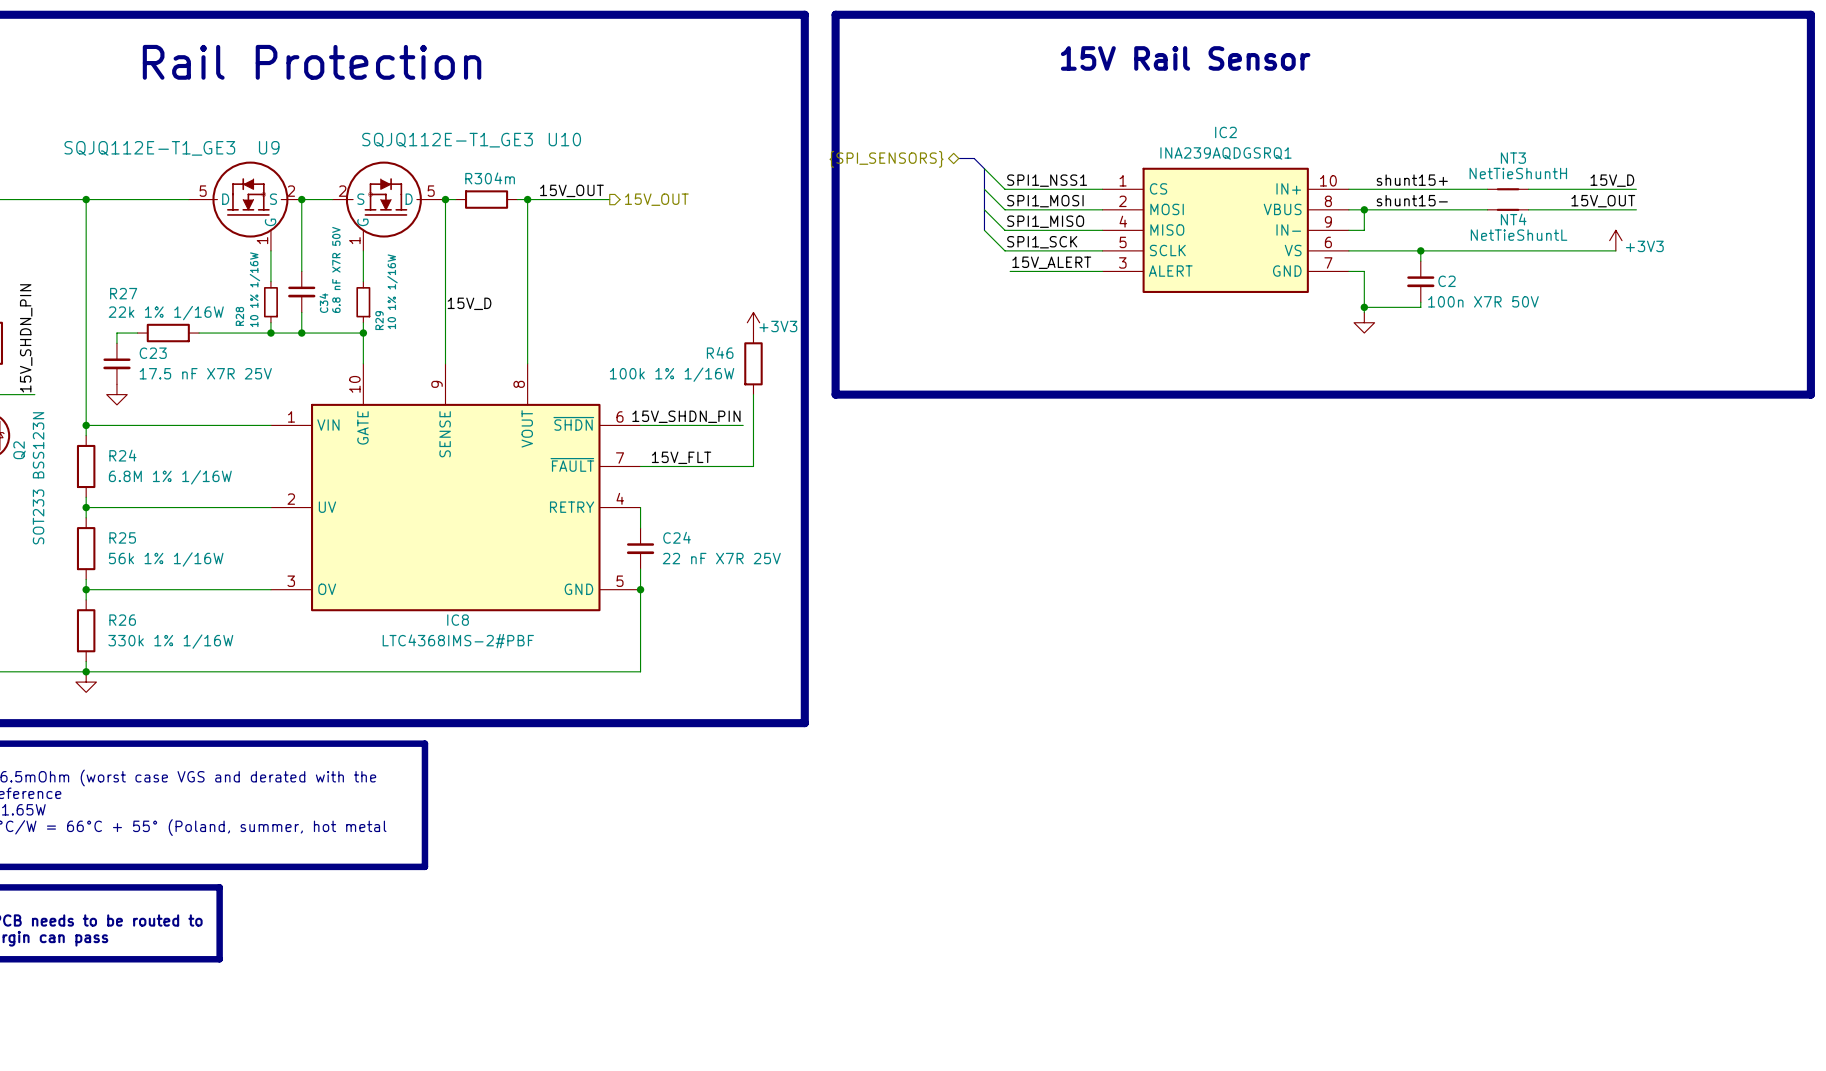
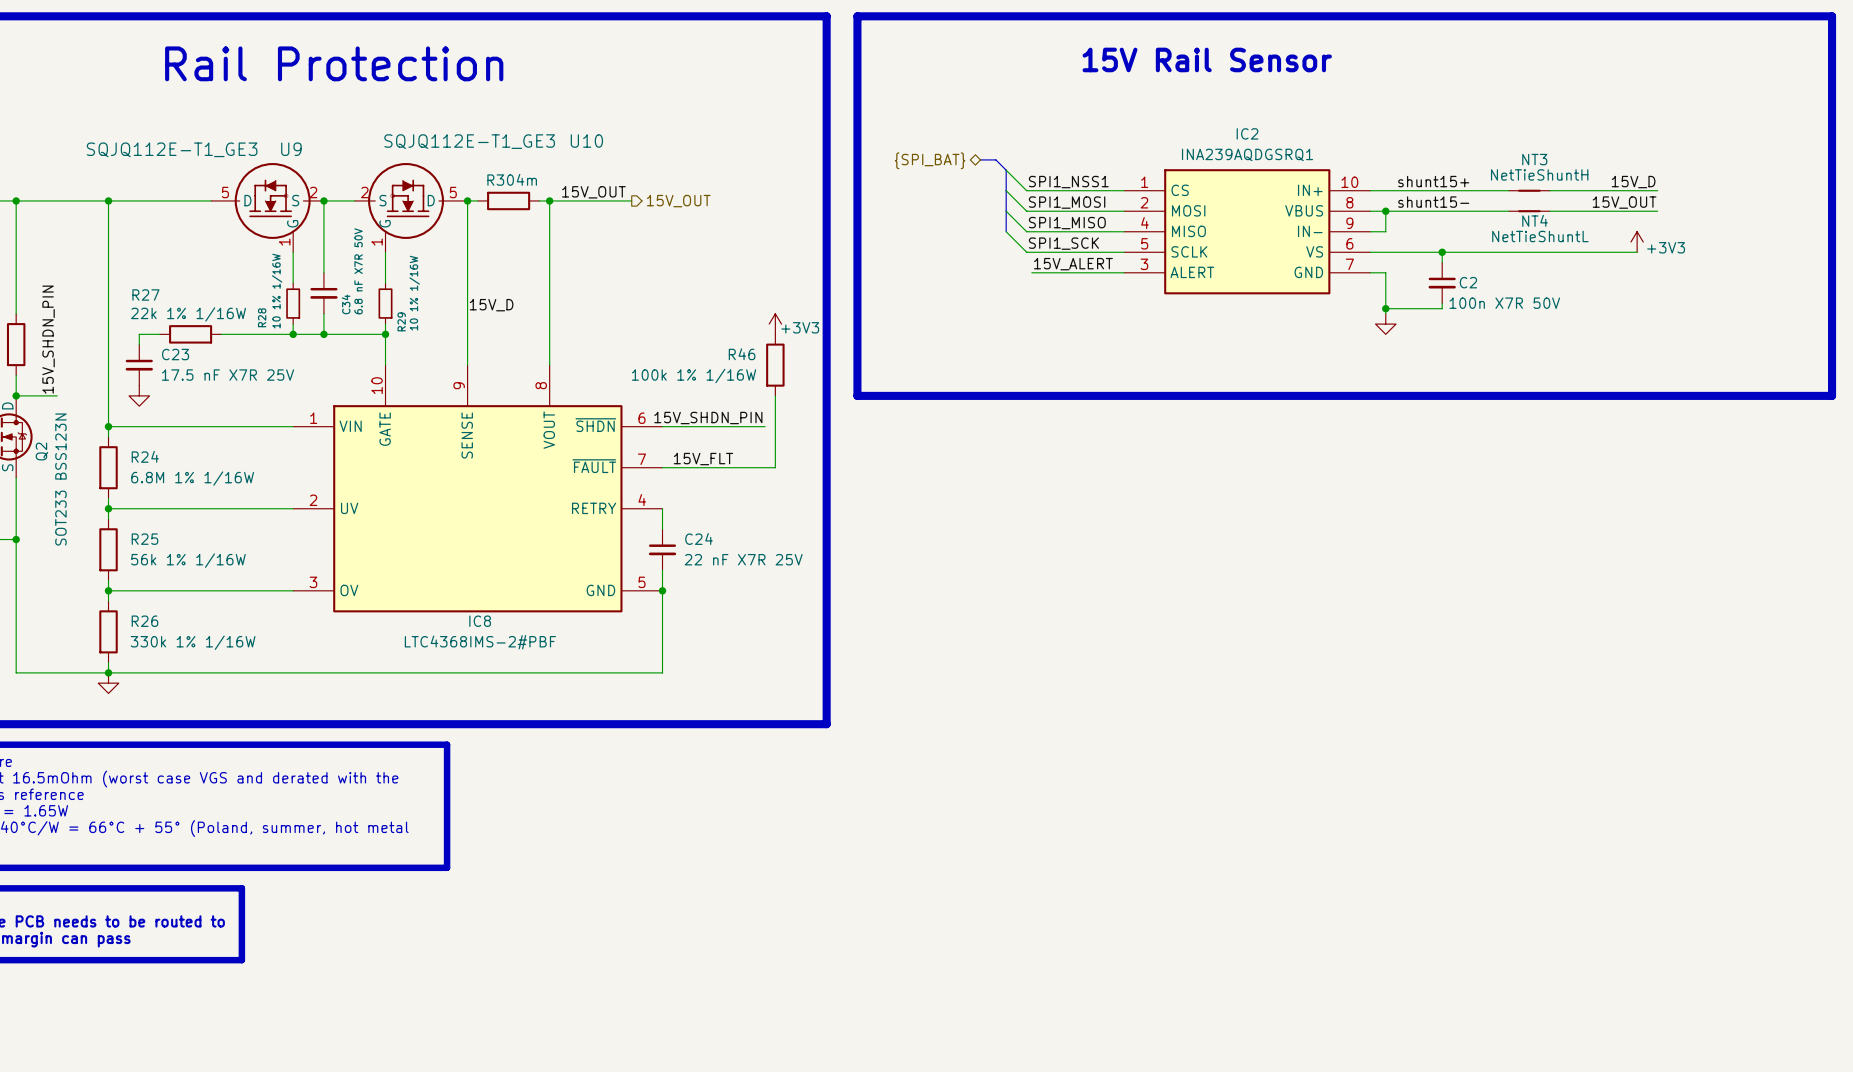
hierarchical label: {SPI_SENSORS} (886, 159) -> {SPI_BAT} (930, 160)

